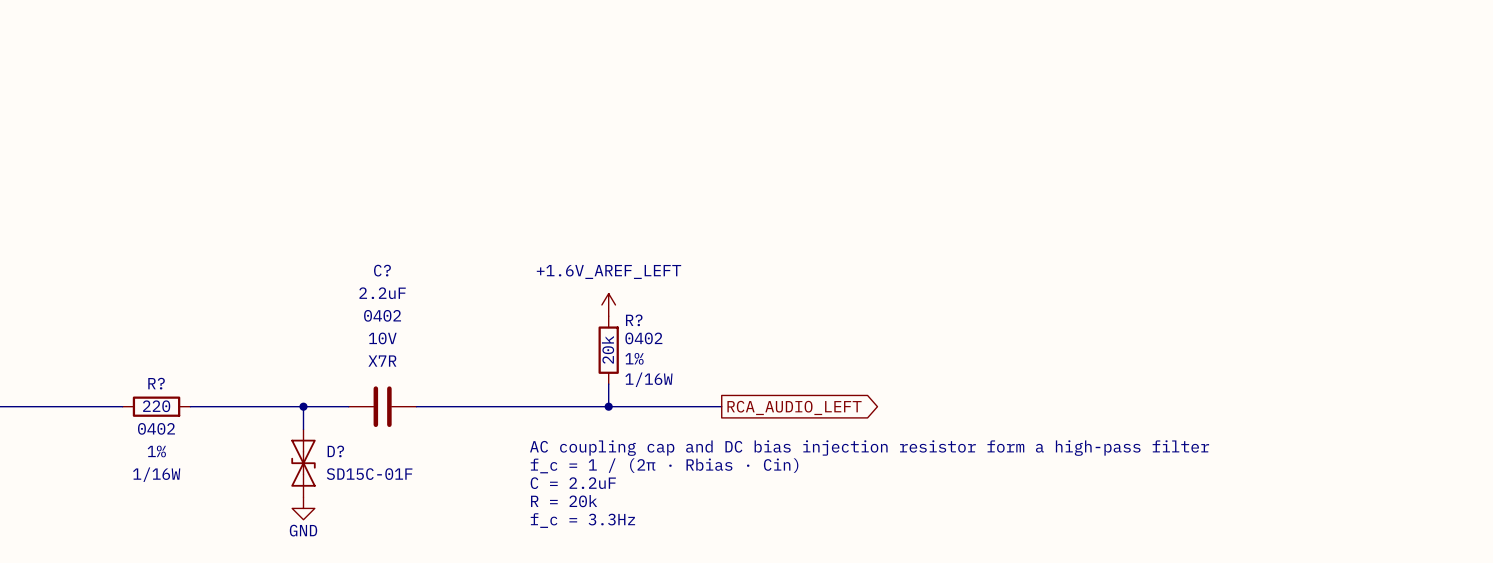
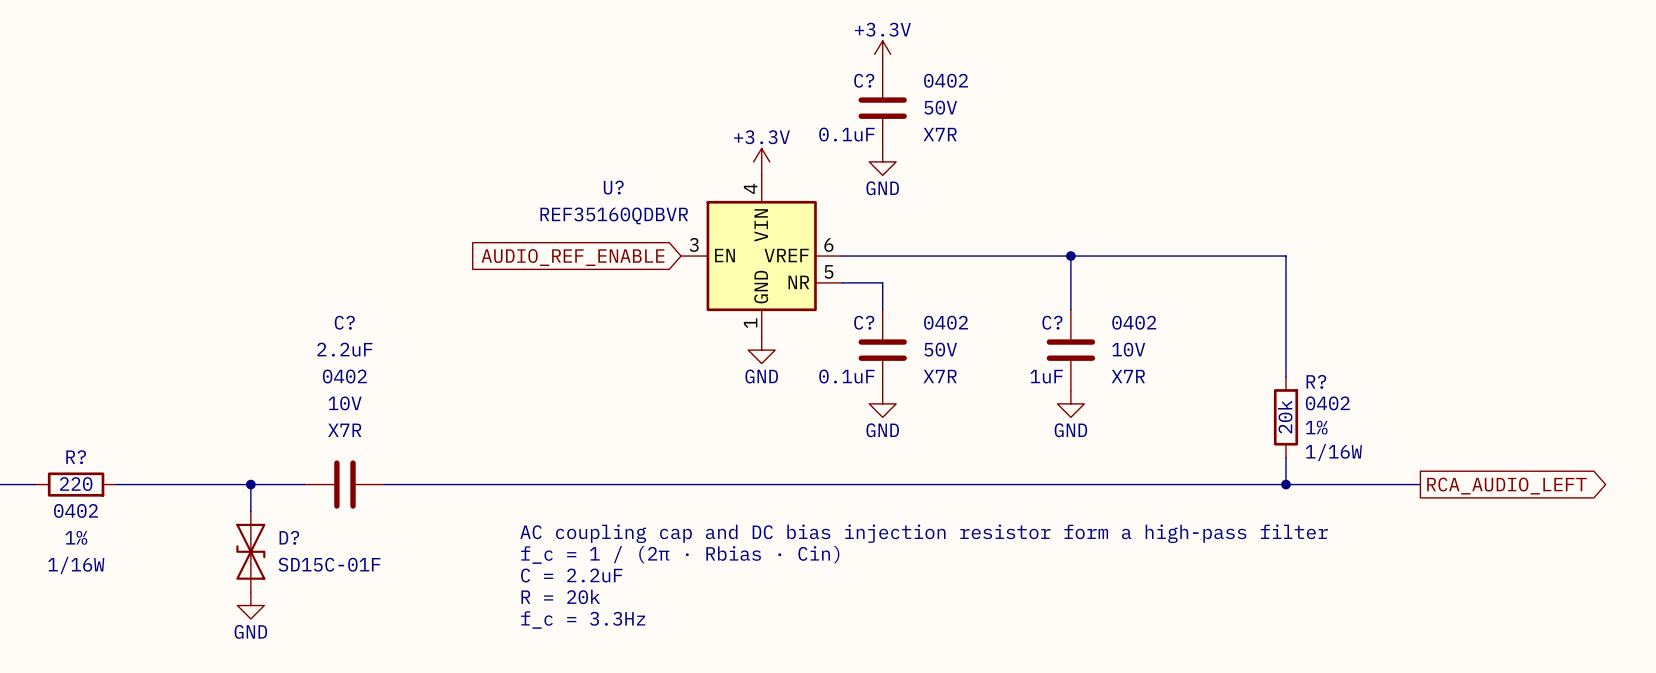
power symbol: none -> +3.3V (882, 54)
C?: none -> 0.1uF (882, 108)
power symbol: none -> +3.3V (761, 161)
power symbol: none -> GND (882, 161)
U?: none -> REF35160QDBVR (761, 256)
wire: none -> (842, 256) (1285, 256) (1285, 377)
wire: none -> (1070, 256) (1070, 309)
junction: none -> (1070, 256)
global label: none -> AUDIO_REF_ENABLE (572, 257)
wire: none -> (842, 282) (882, 282) (882, 309)
power symbol: none -> GND (761, 350)
C?: none -> 0.1uF (882, 350)
C?: none -> 1uF (1070, 350)
power symbol: +1.6V_AREF_LEFT (608, 304) -> none
power symbol: none -> GND (882, 403)
power symbol: none -> GND (1070, 403)
R?: 20k (608, 350) -> none
R?: none -> 20k (1285, 417)
wire: (608, 384) (608, 406) -> none
wire: none -> (1285, 457) (1285, 484)
junction: (608, 406) -> none
wire: none -> (748, 484) (1420, 484)
junction: none -> (1285, 484)
global label: RCA_AUDIO_LEFT (794, 407) -> none
global label: none -> RCA_AUDIO_LEFT (1506, 486)

